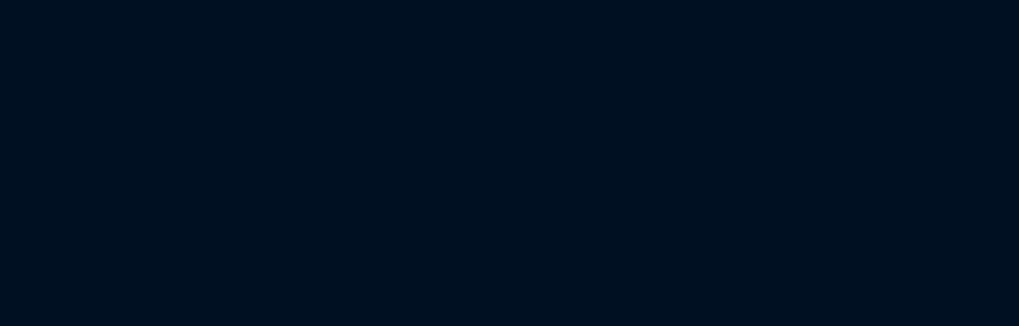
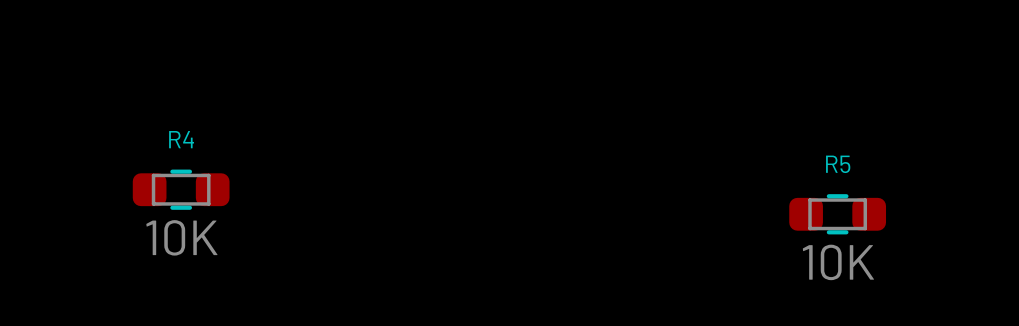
R4: none -> 10K (181, 189)
R5: none -> 10K (837, 214)

